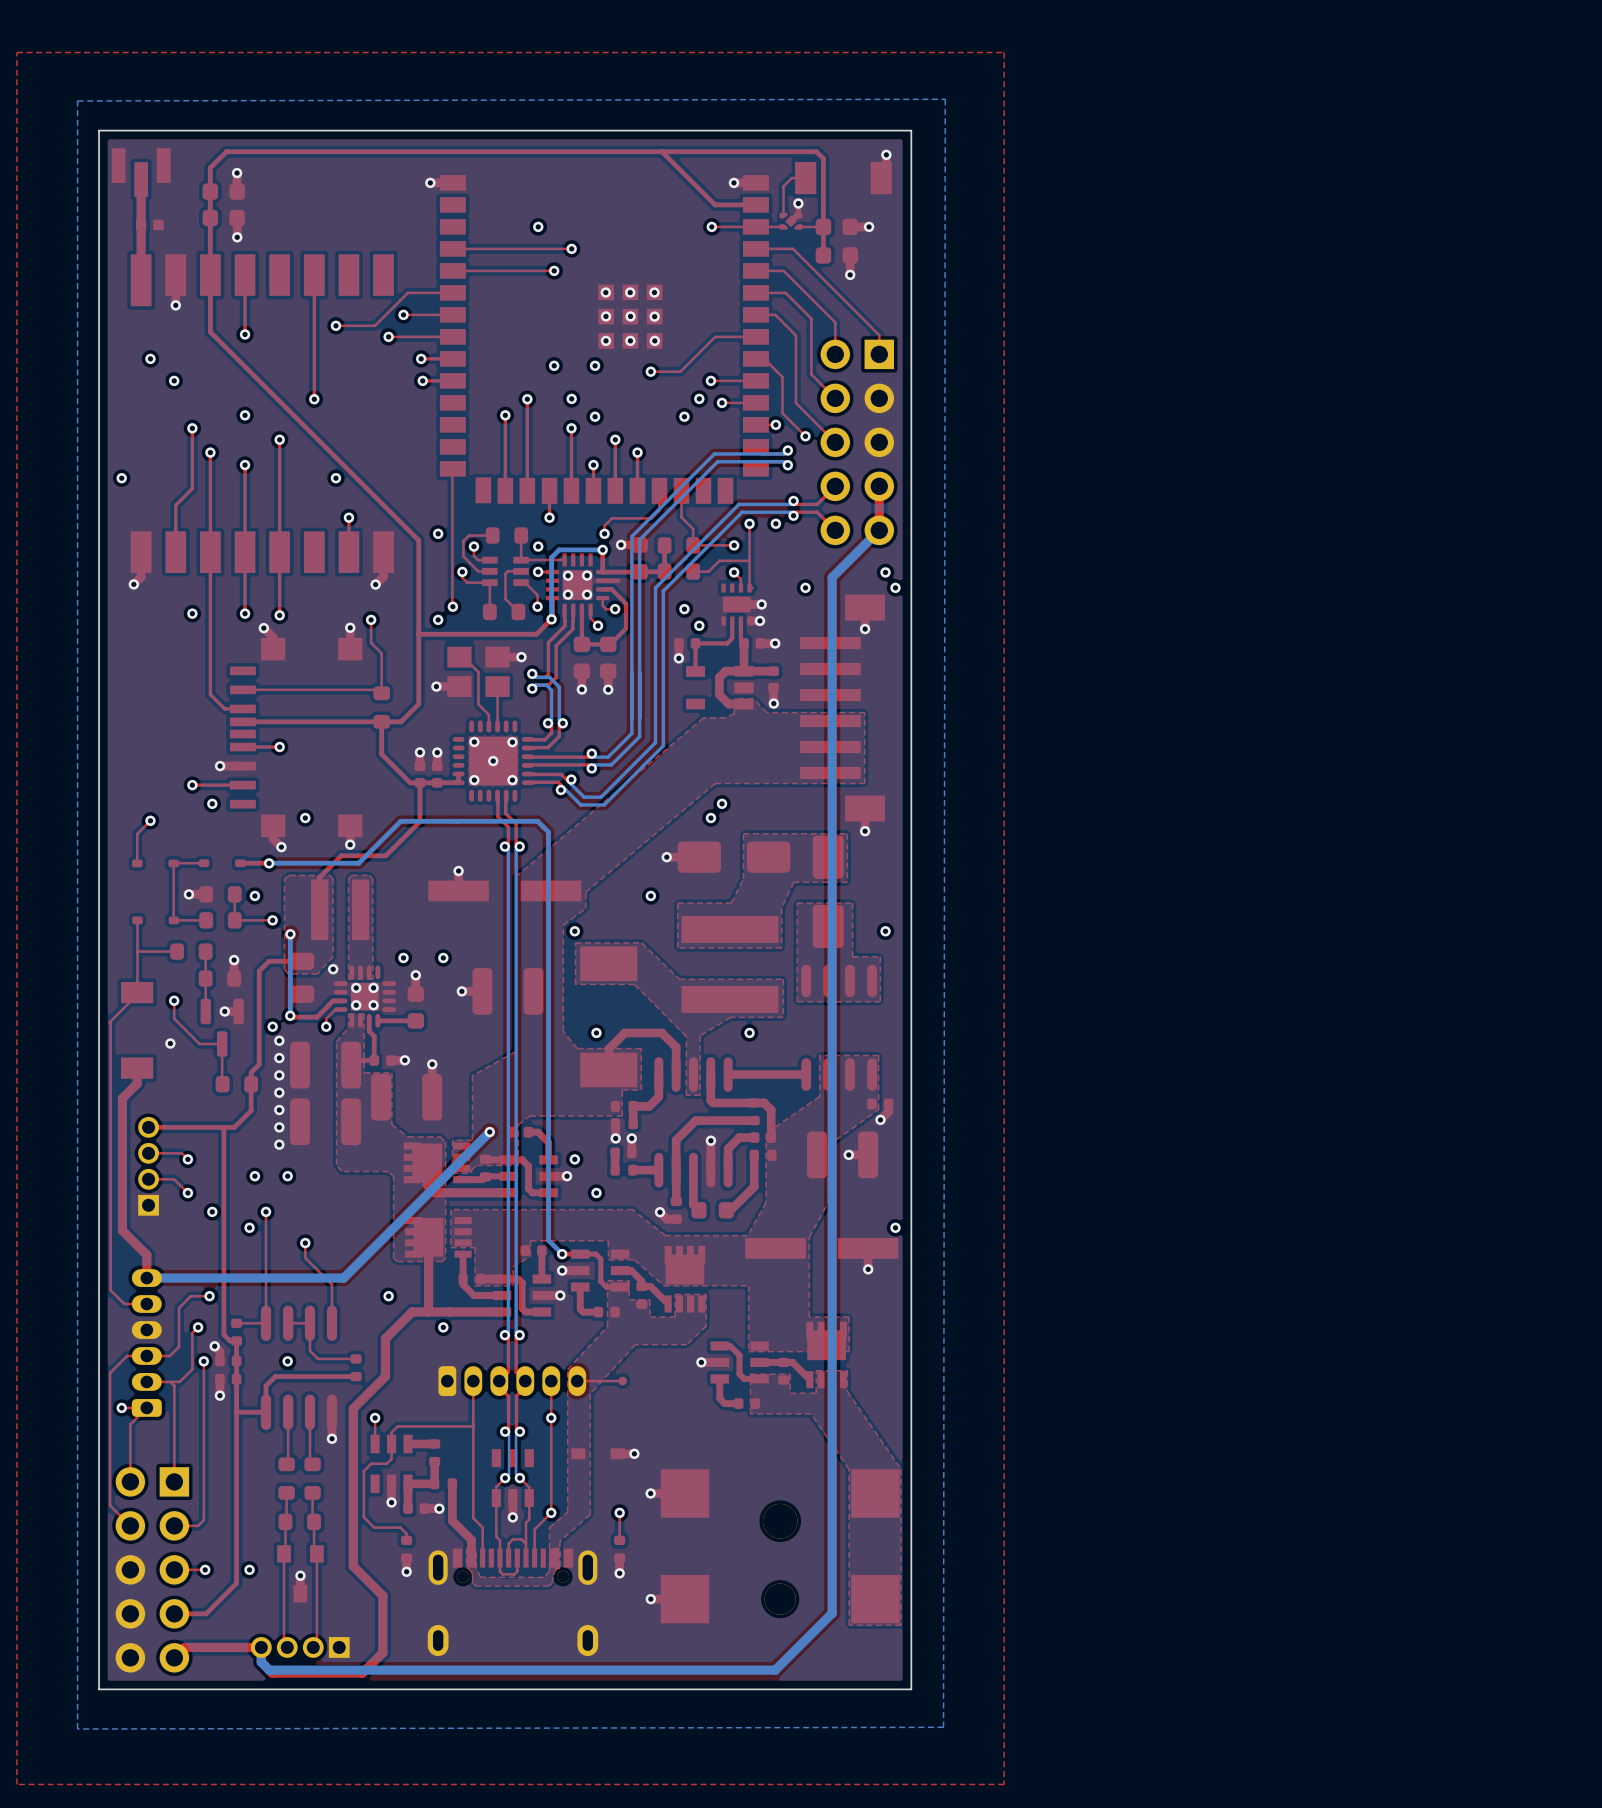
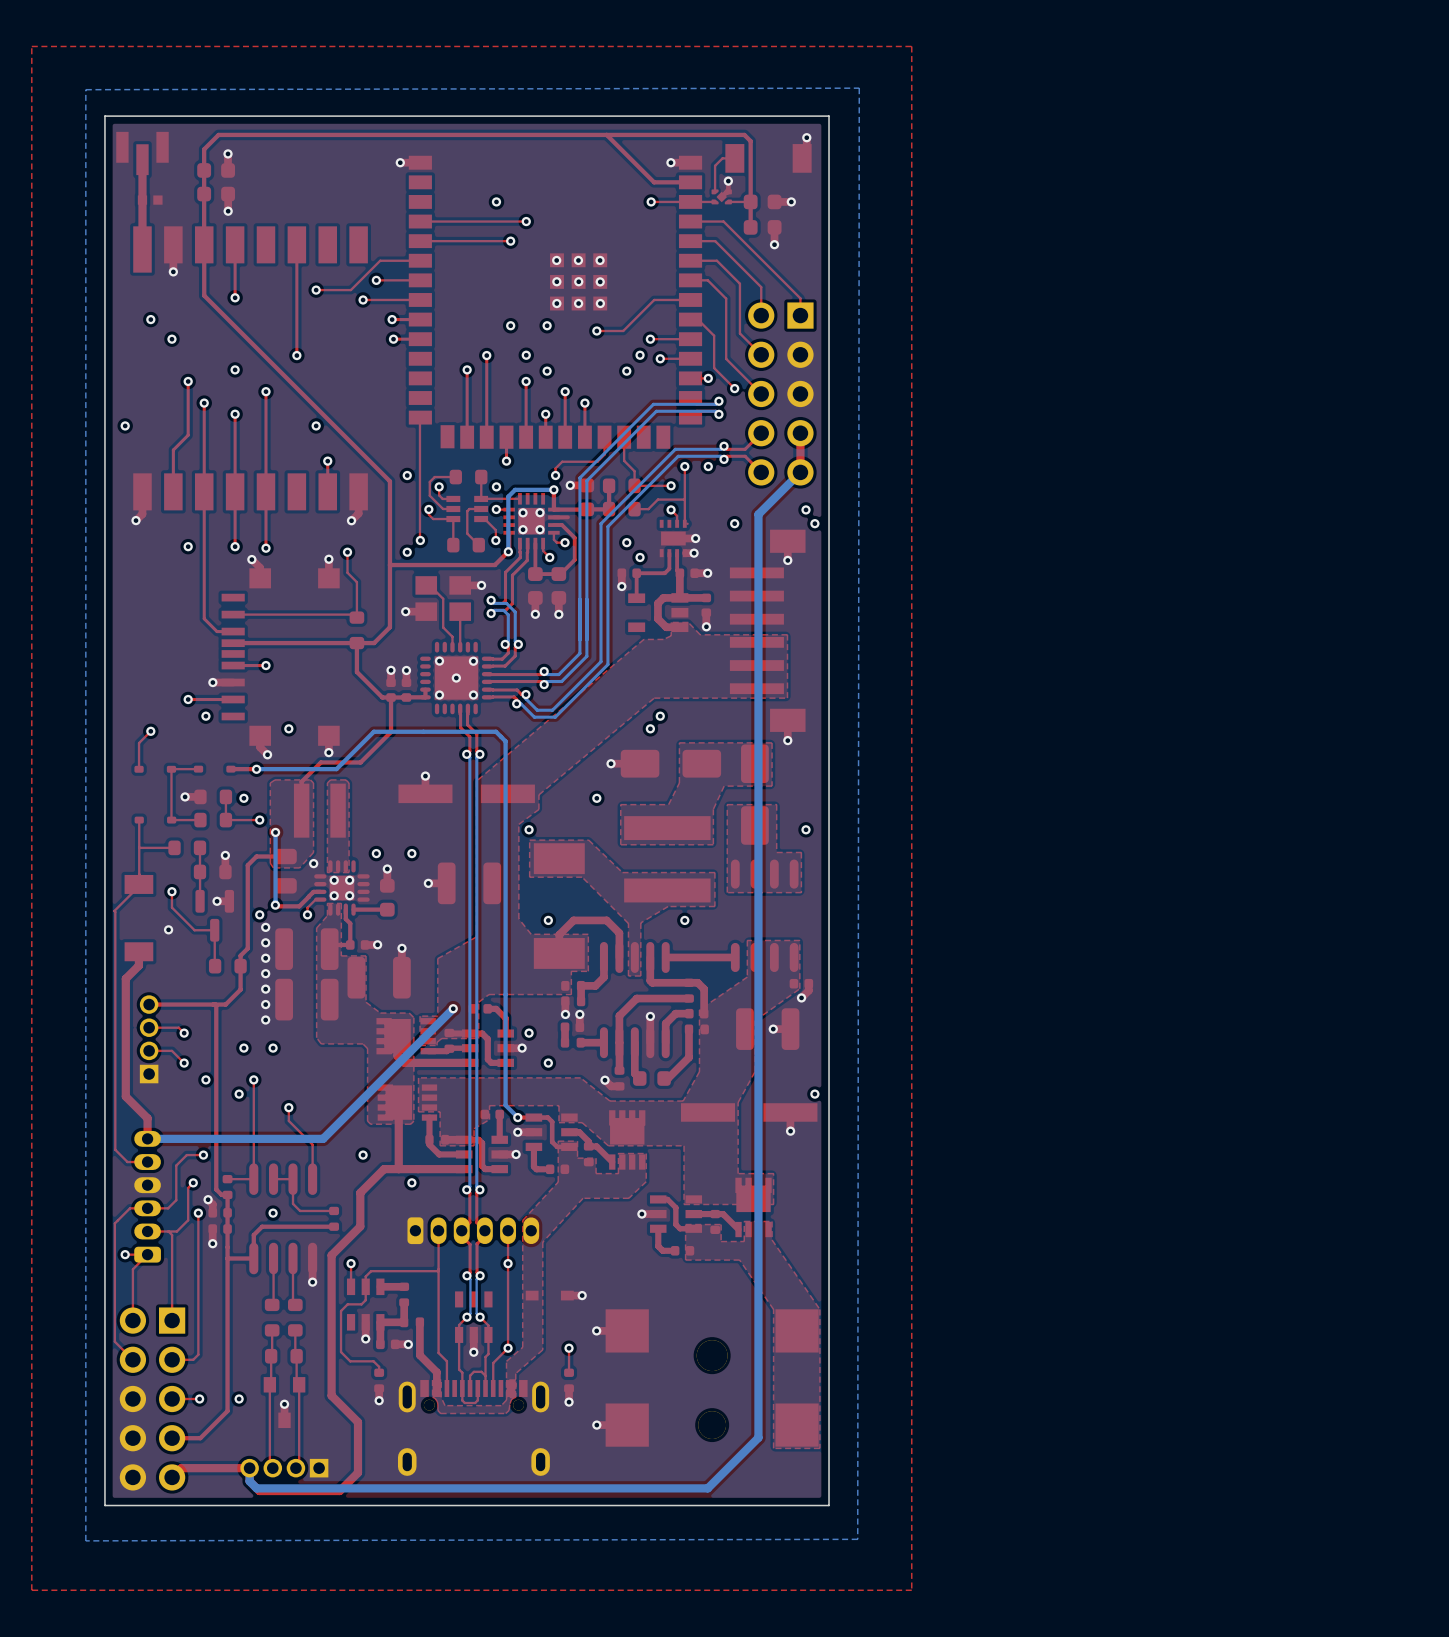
top track: (622, 1381) (577, 1381) -> none
part: (622, 1381) -> none

